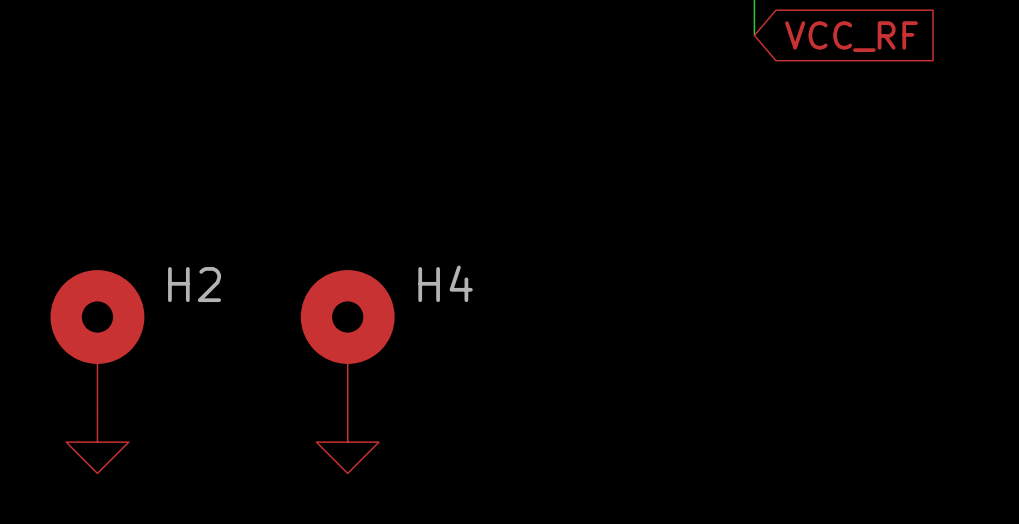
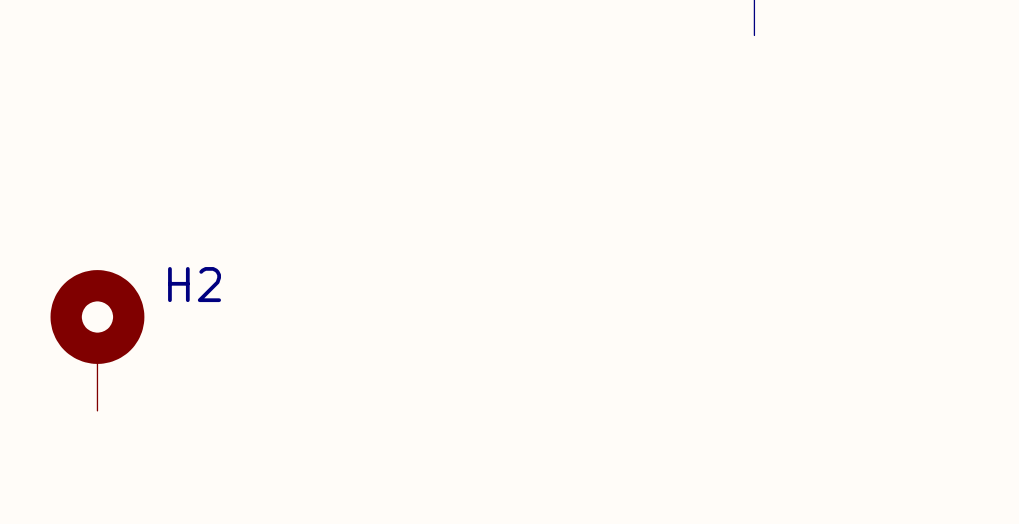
global label: VCC_RF (851, 36) -> none
H4: (347, 340) -> none
power symbol: (97, 442) -> none
power symbol: (347, 442) -> none

